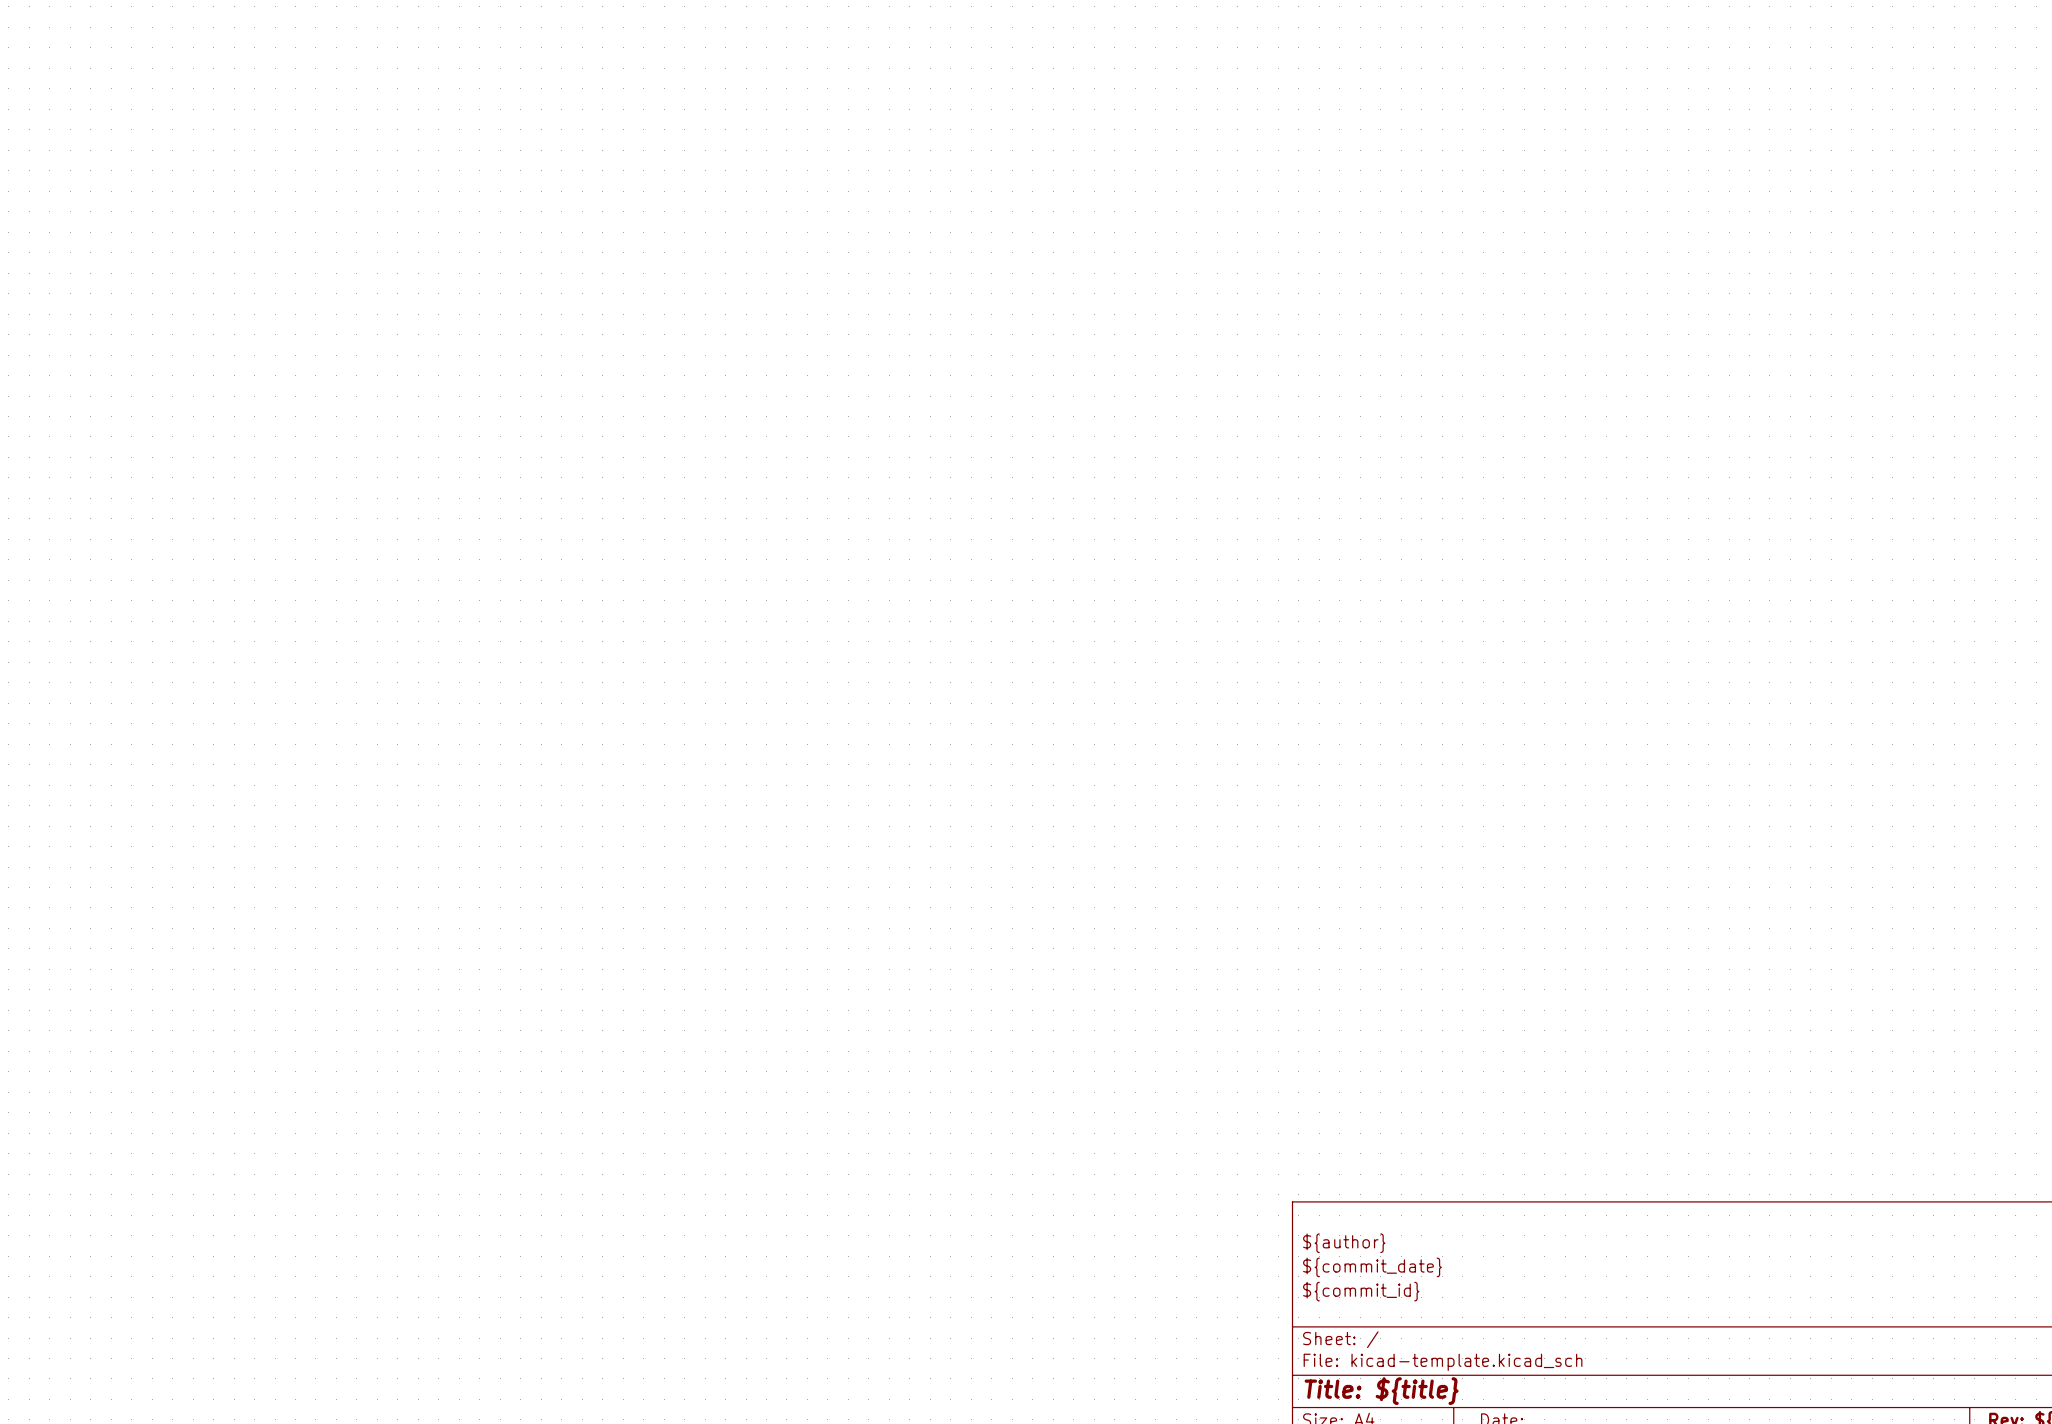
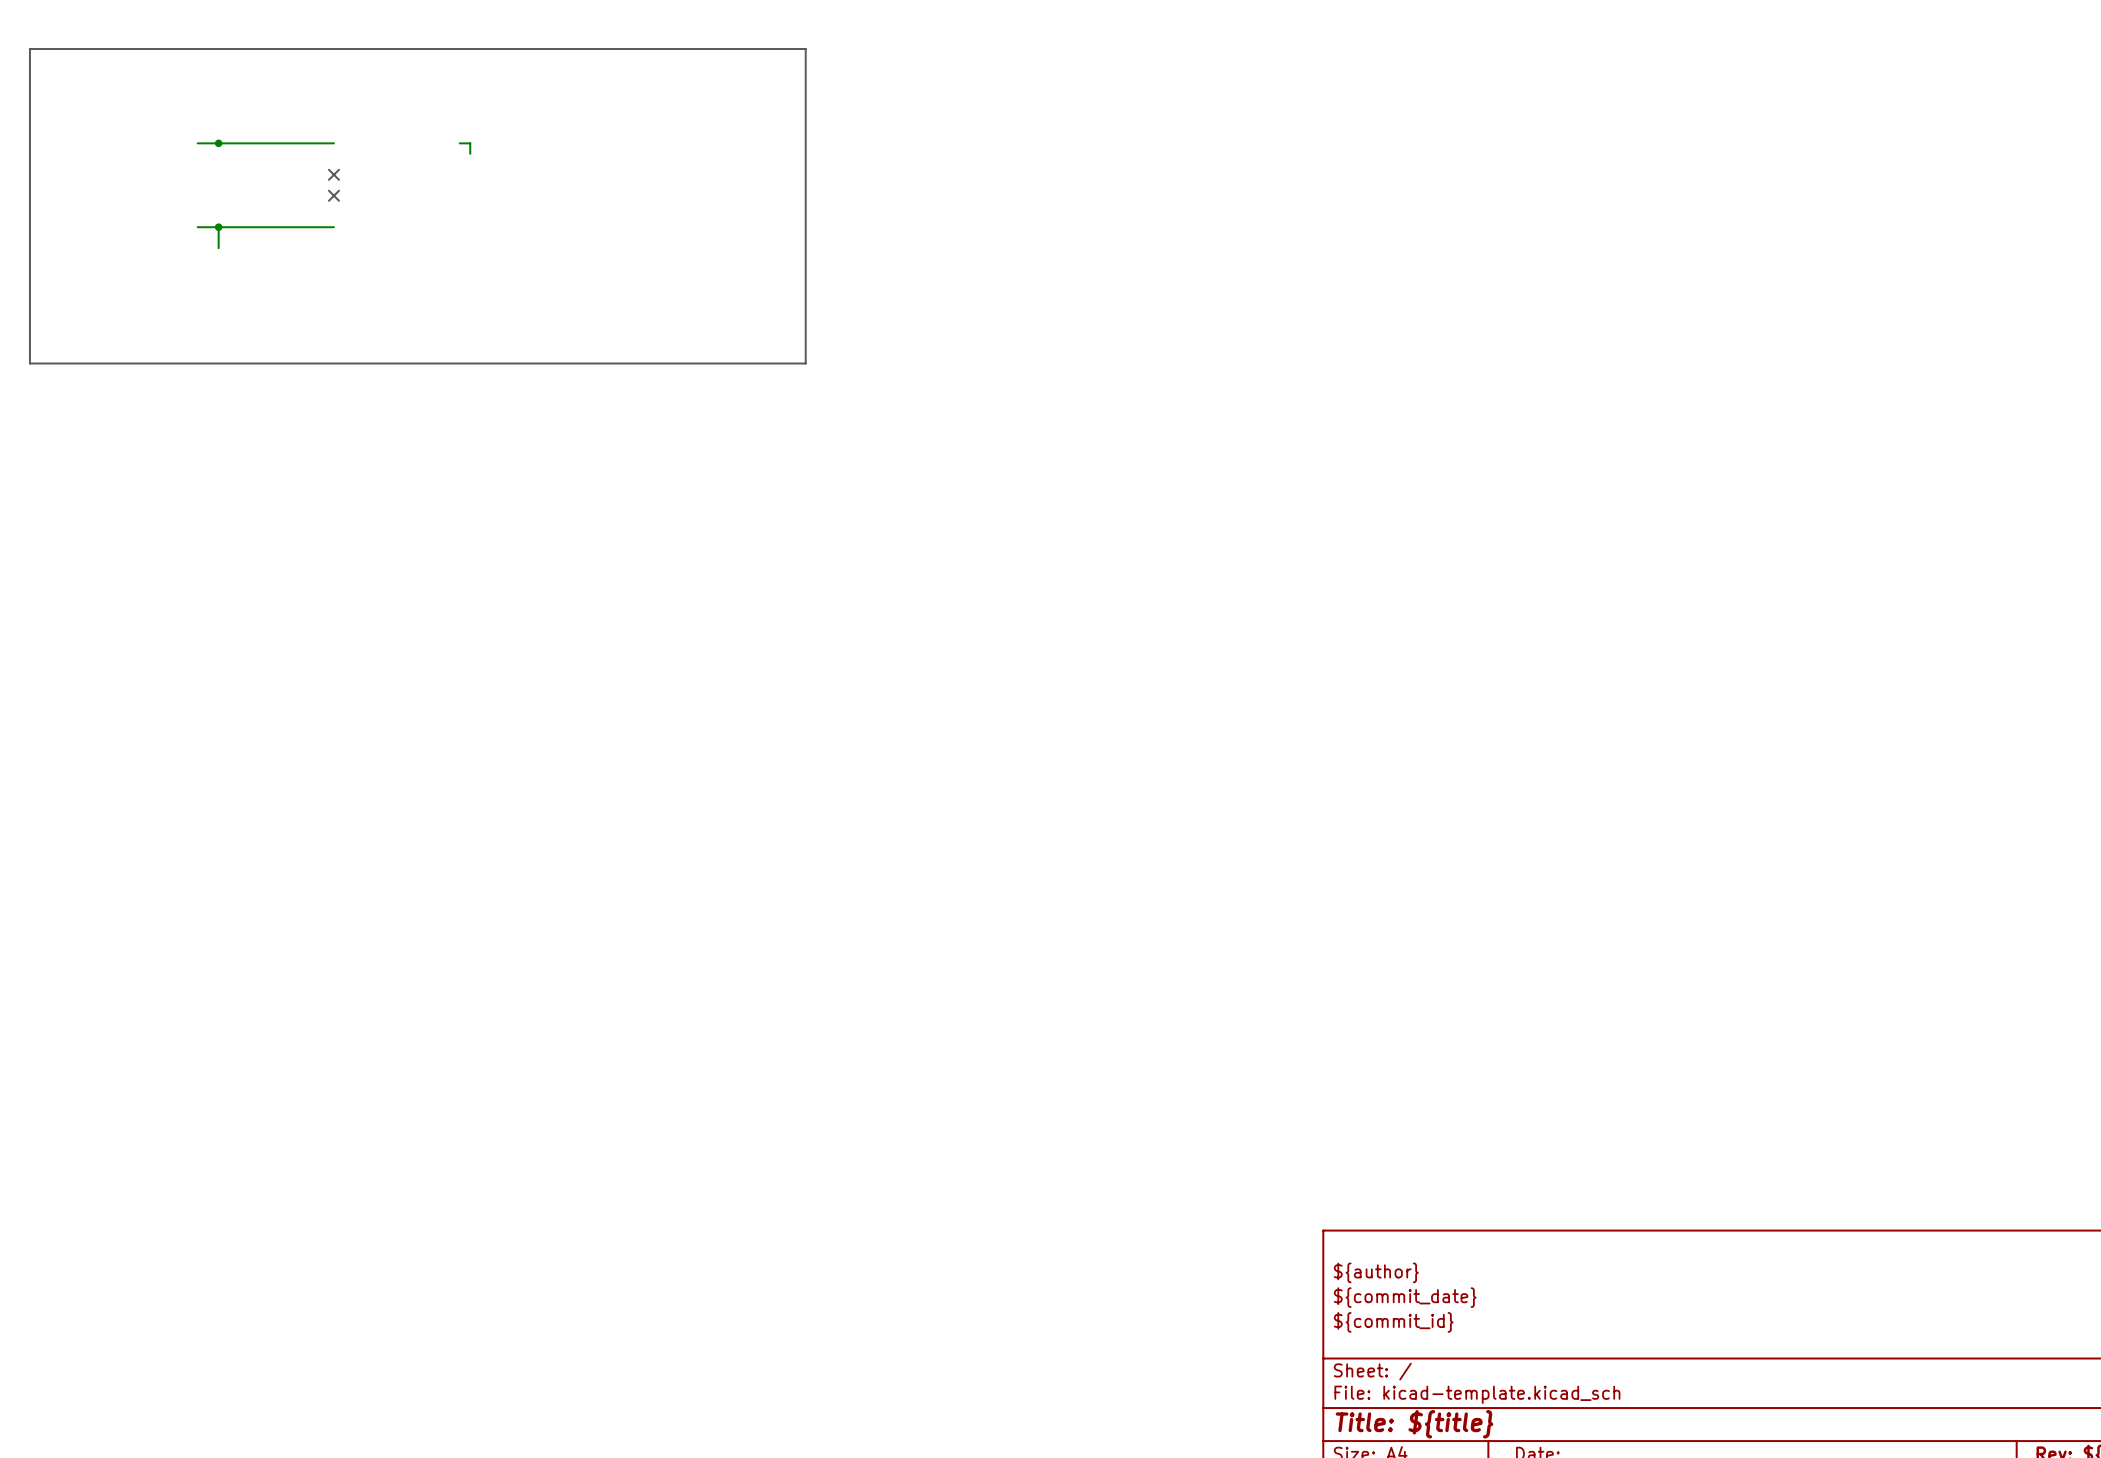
line: none -> (29, 49) (29, 363) (805, 363) (805, 49) (29, 49)
wire: none -> (197, 143) (333, 143)
junction: none -> (218, 143)
wire: none -> (459, 143) (470, 143) (470, 153)
no-connect mark: none -> (333, 174)
no-connect mark: none -> (333, 195)
wire: none -> (197, 227) (333, 227)
wire: none -> (218, 227) (218, 248)
junction: none -> (218, 227)

